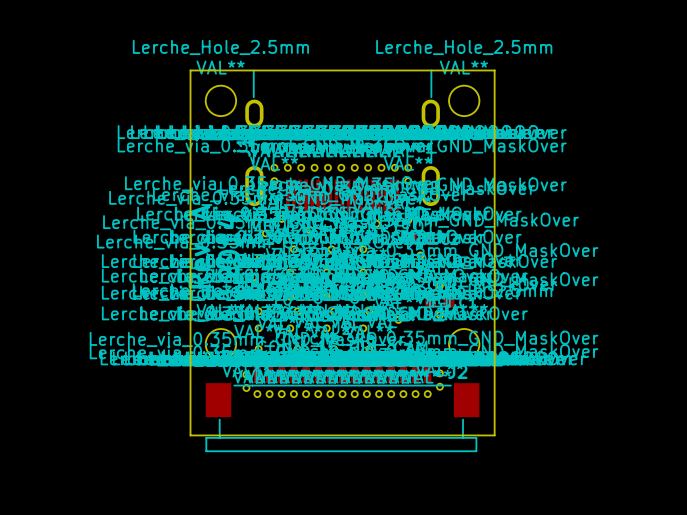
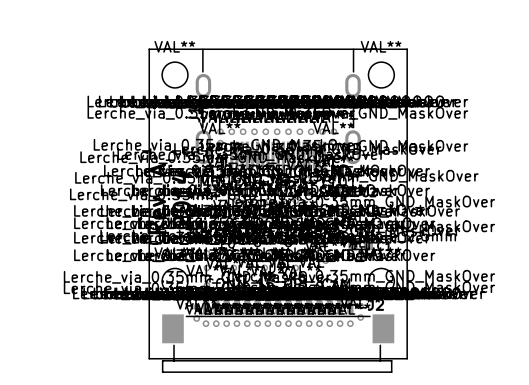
Lerche_Hole_2.5mm name: Lerche_Hole_2.5mm (220, 47) -> none
Lerche_Hole_2.5mm name: Lerche_Hole_2.5mm (464, 47) -> none

